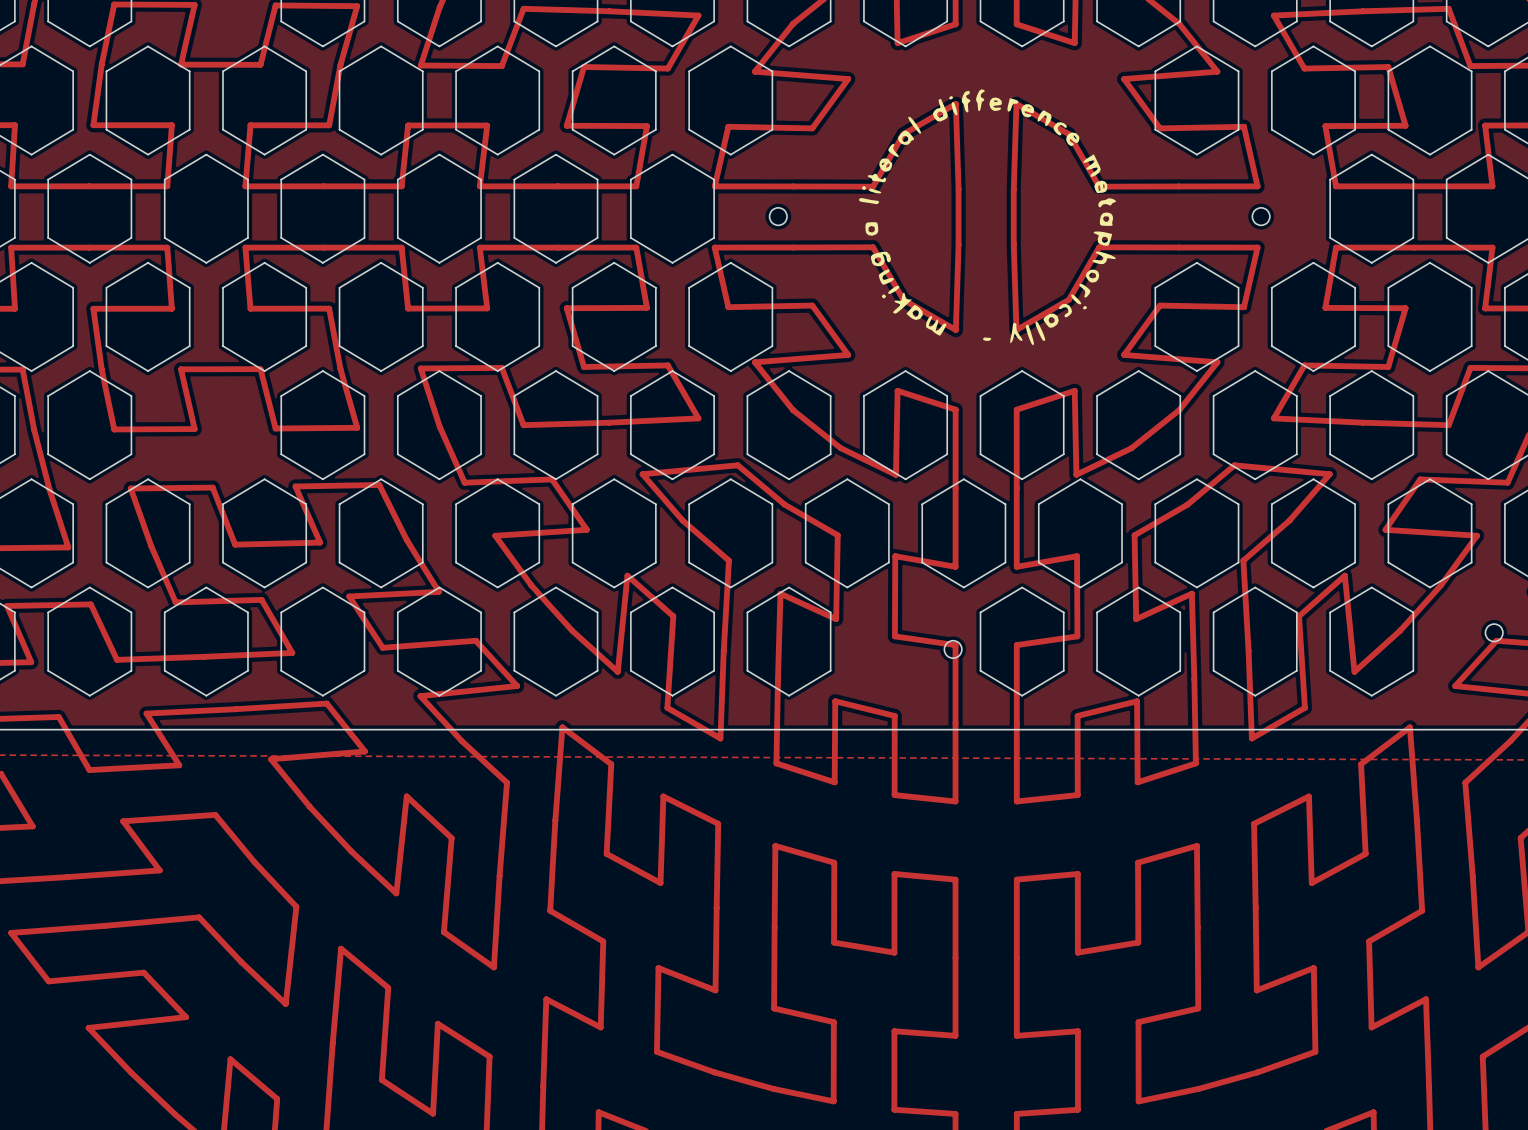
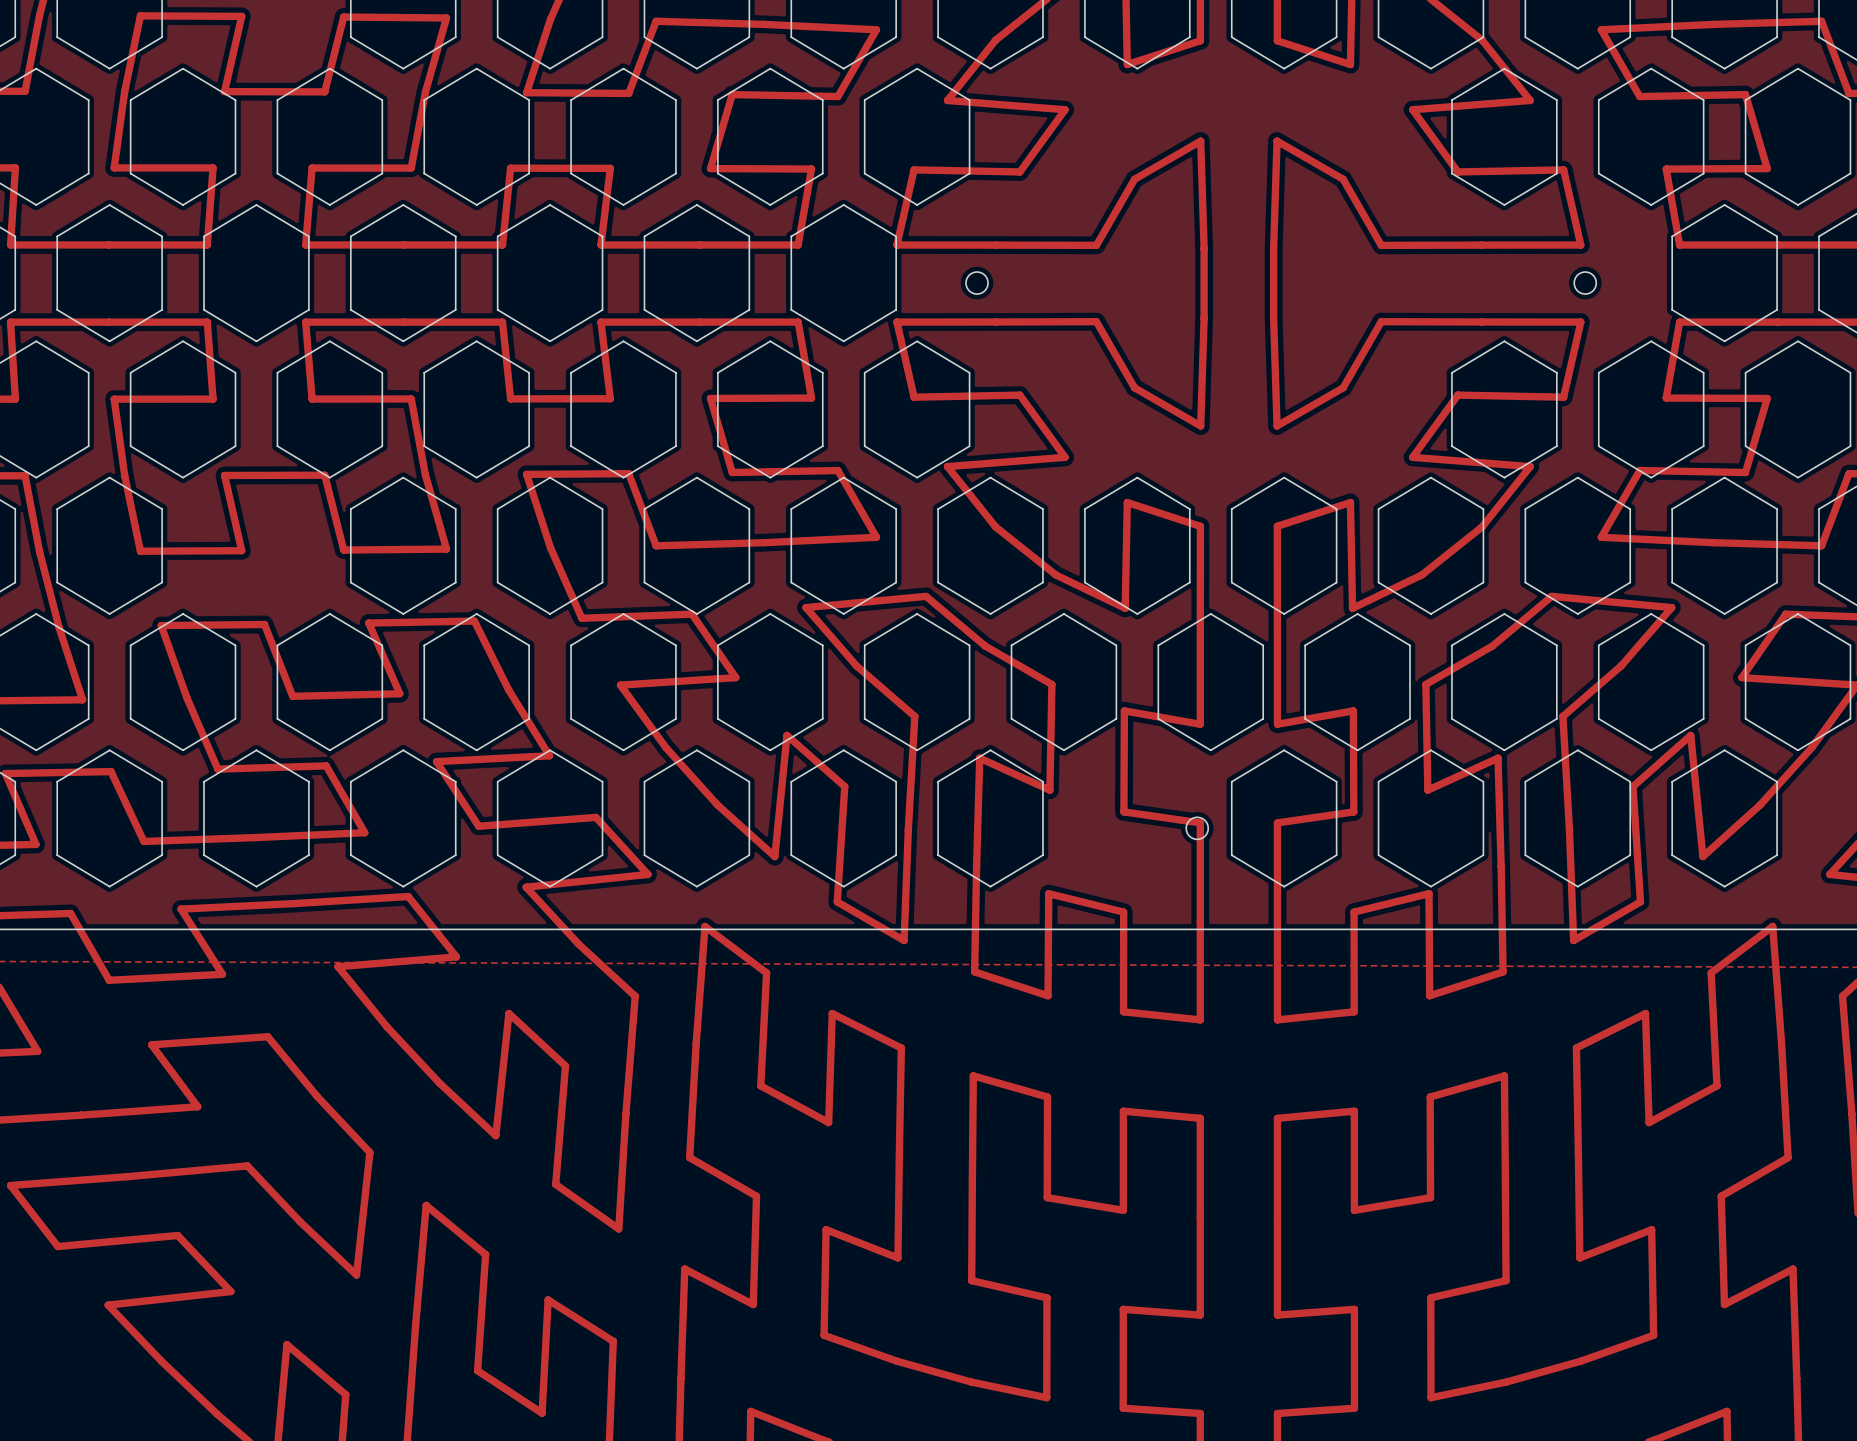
drawing: [859, 89, 1117, 346] -> none

